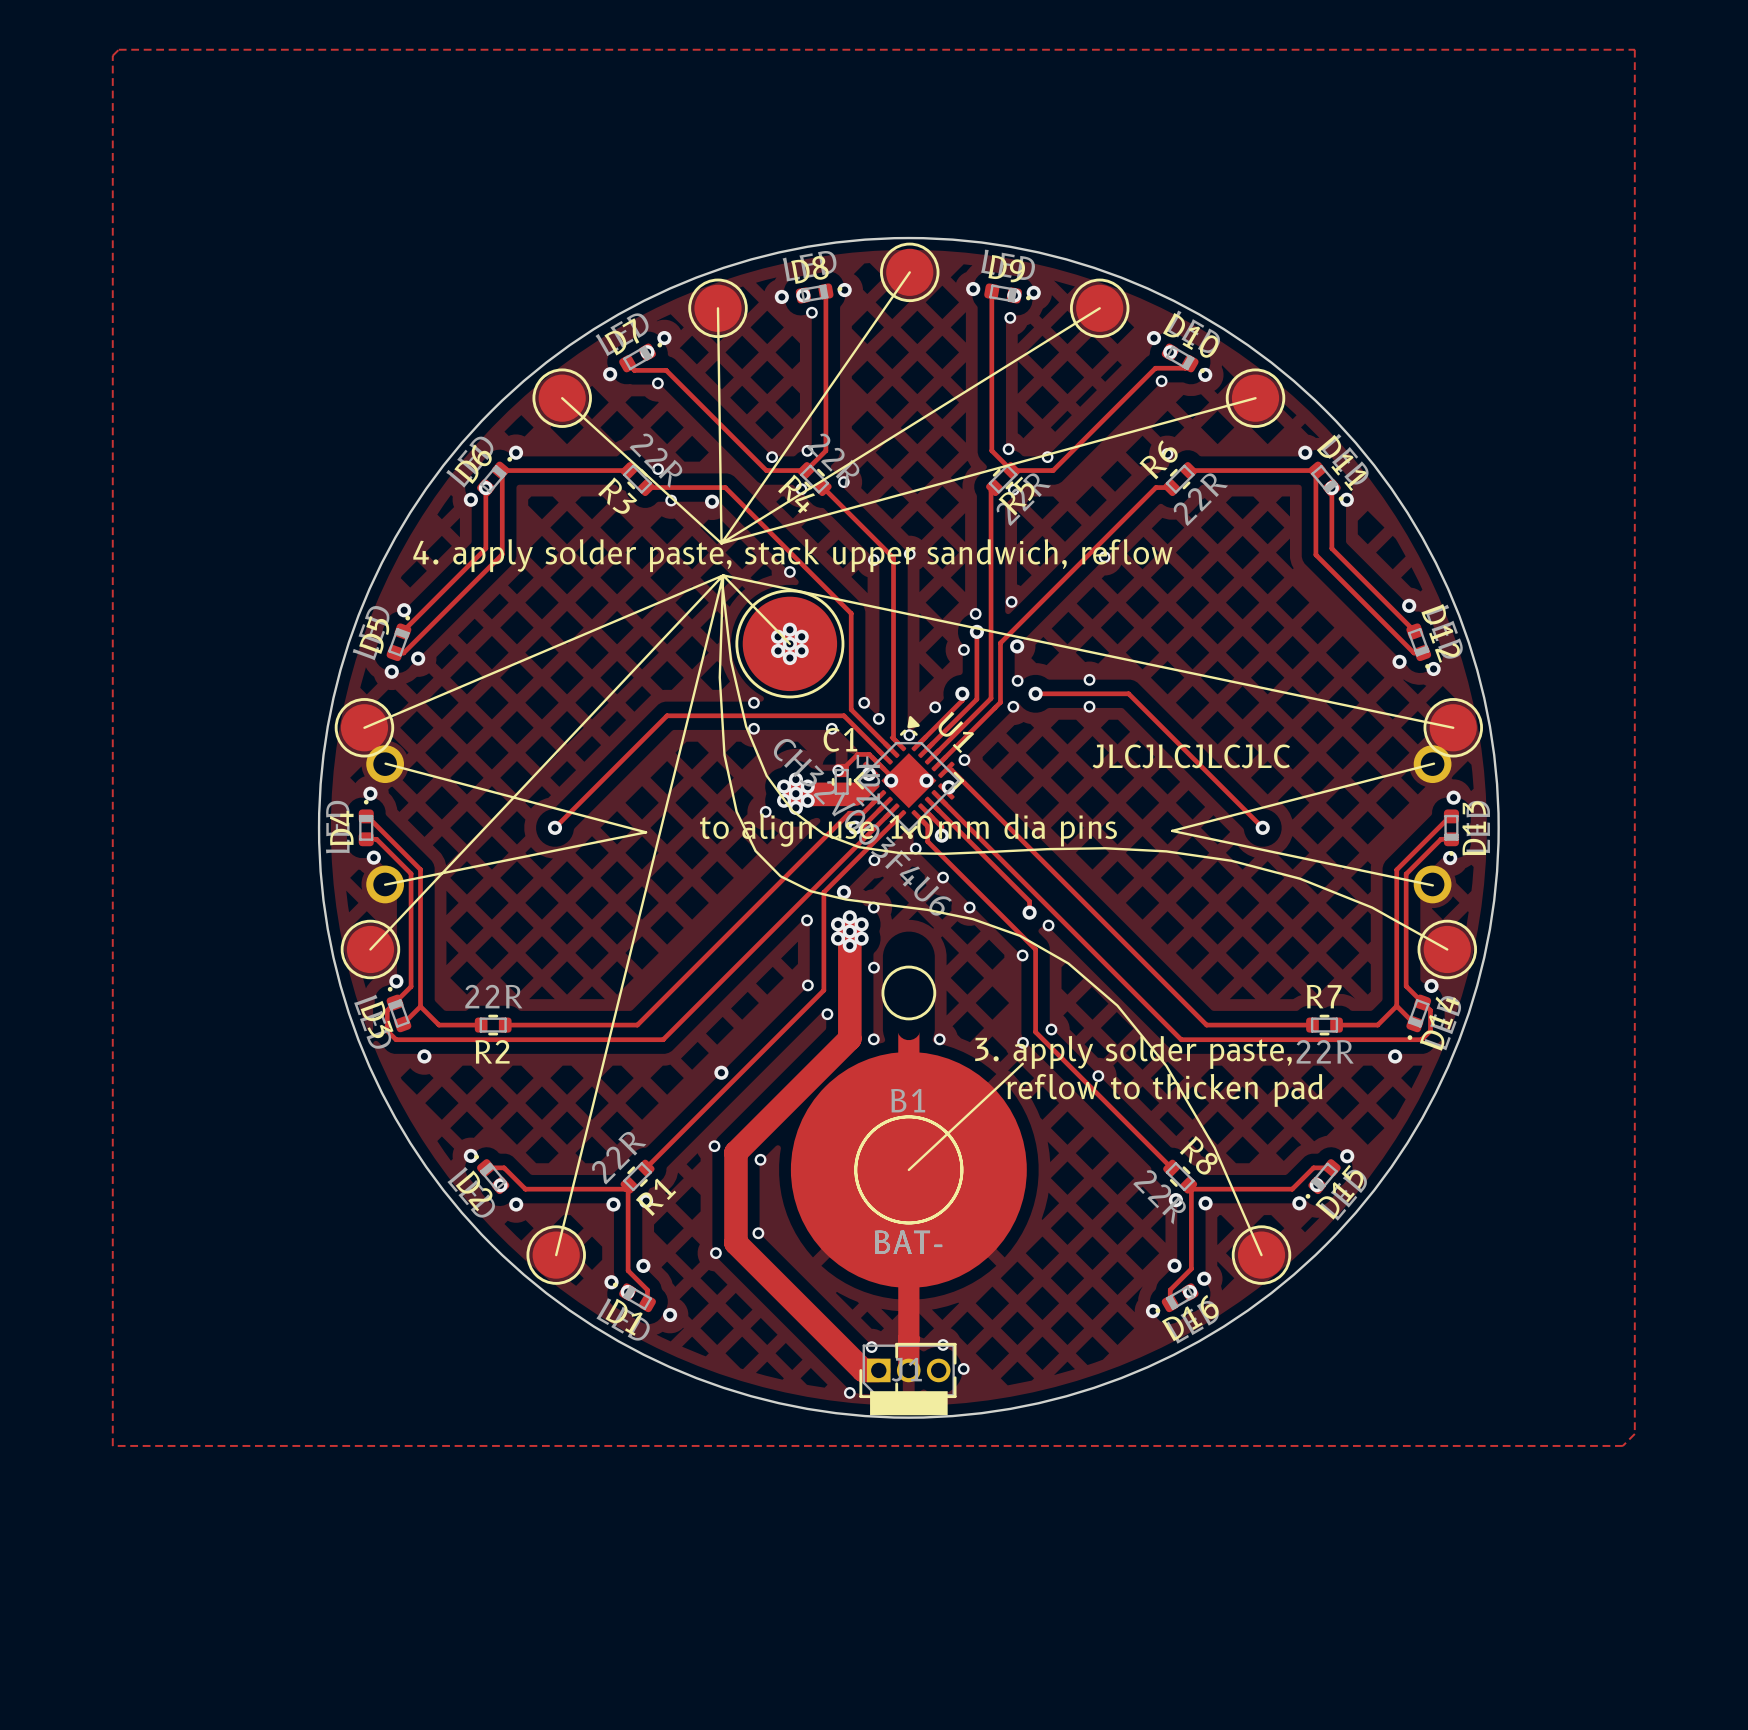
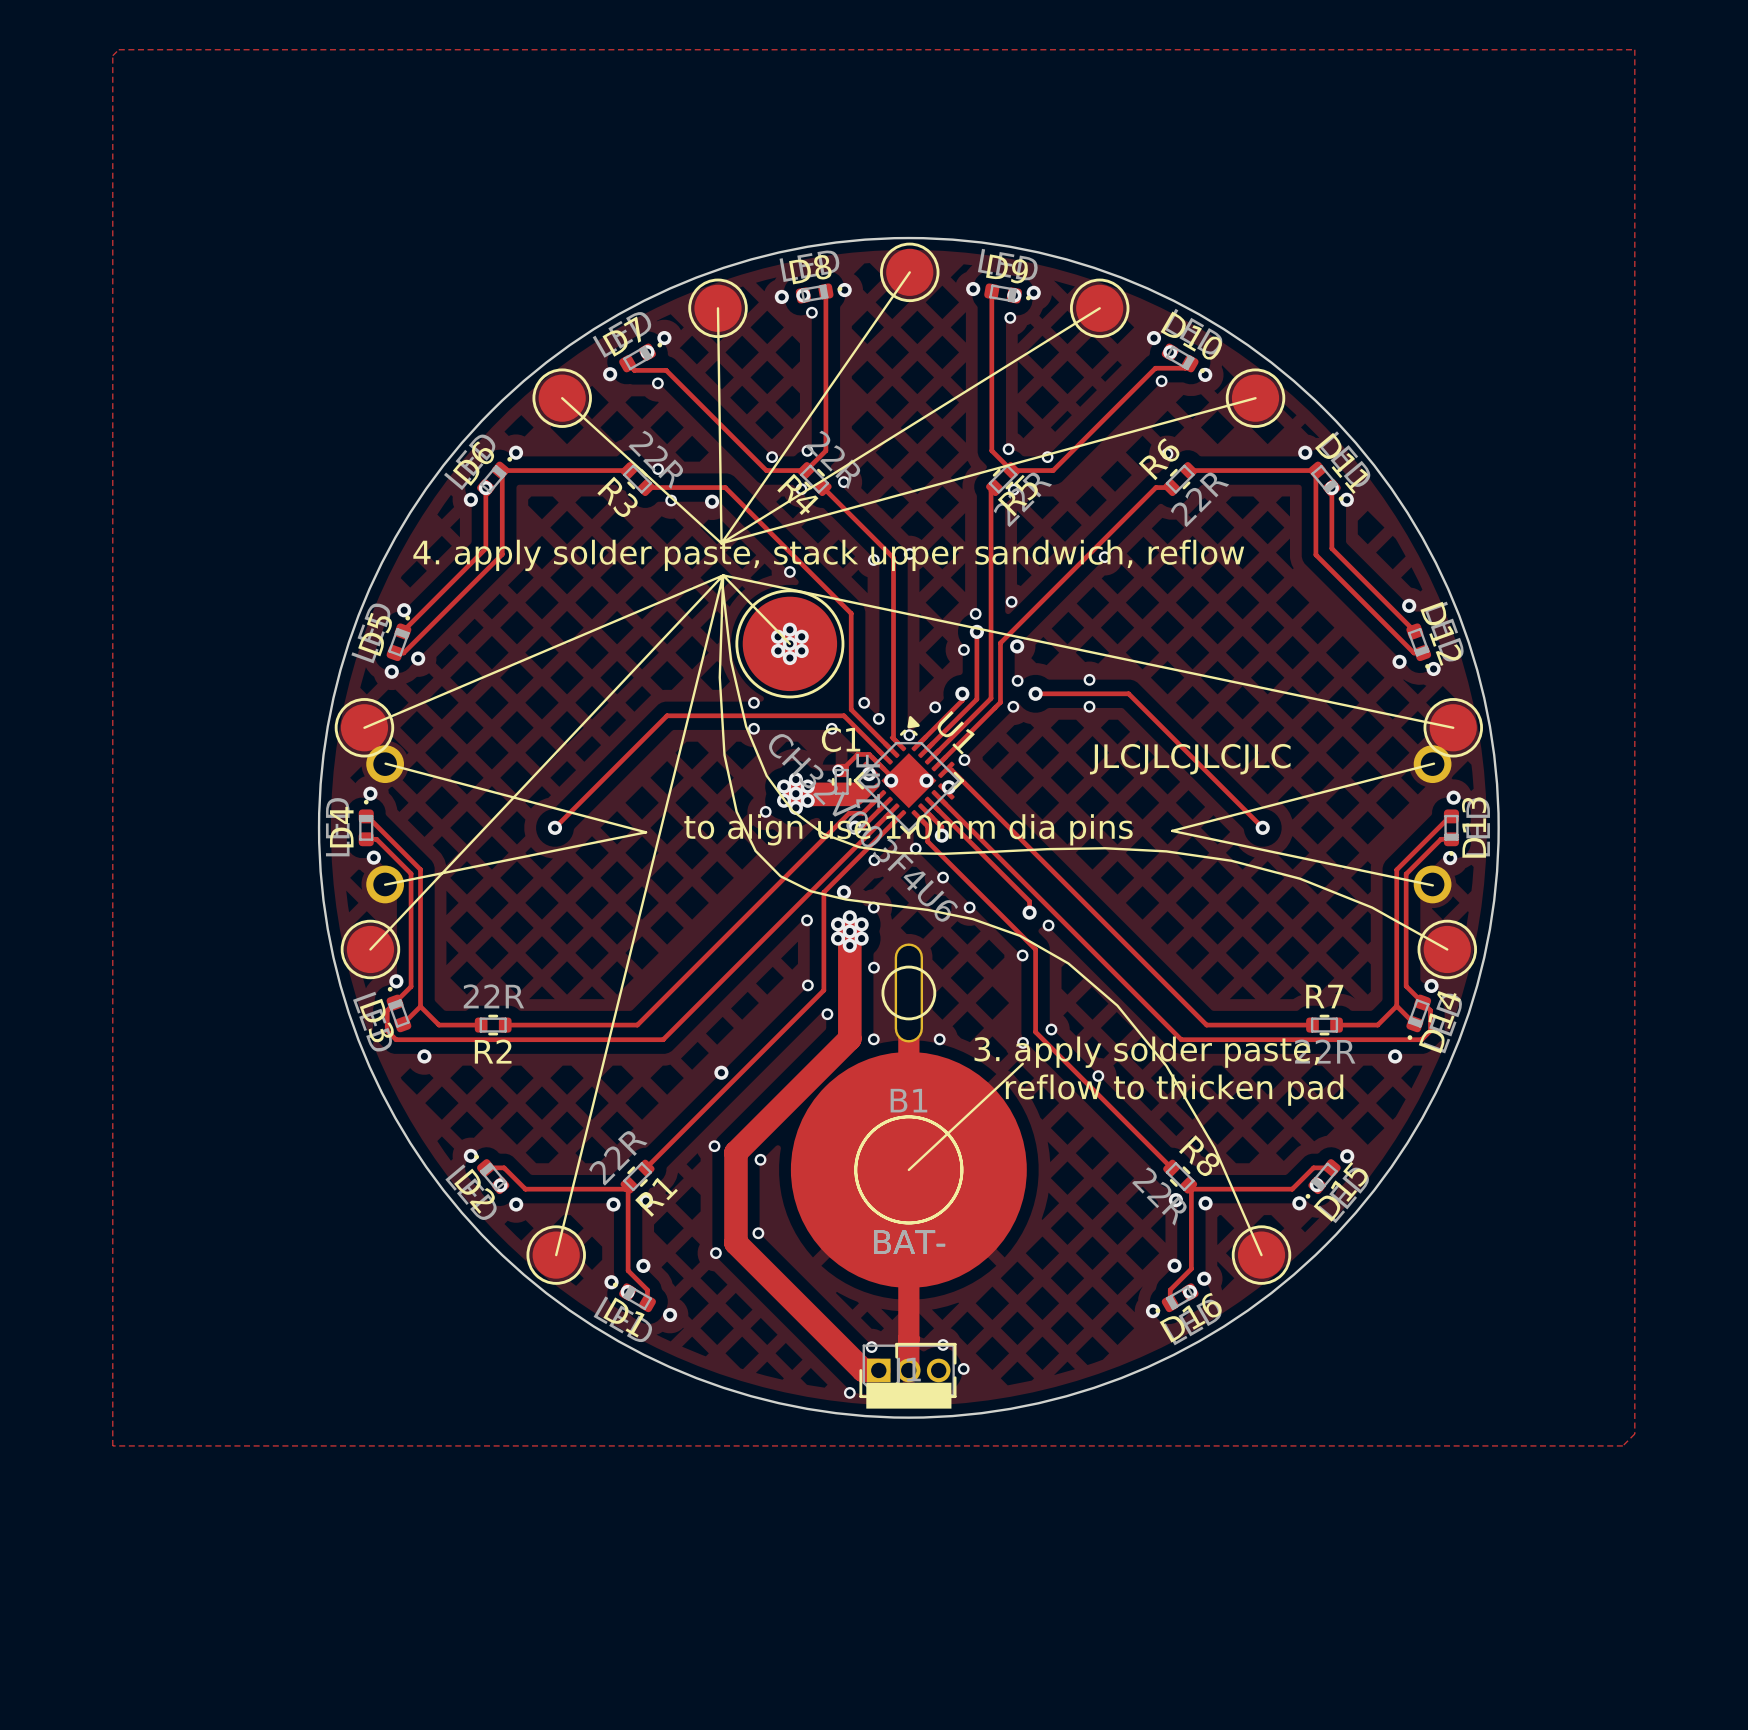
part footprint: [881, 945, 937, 1041] -> [881, 943, 937, 1043]

